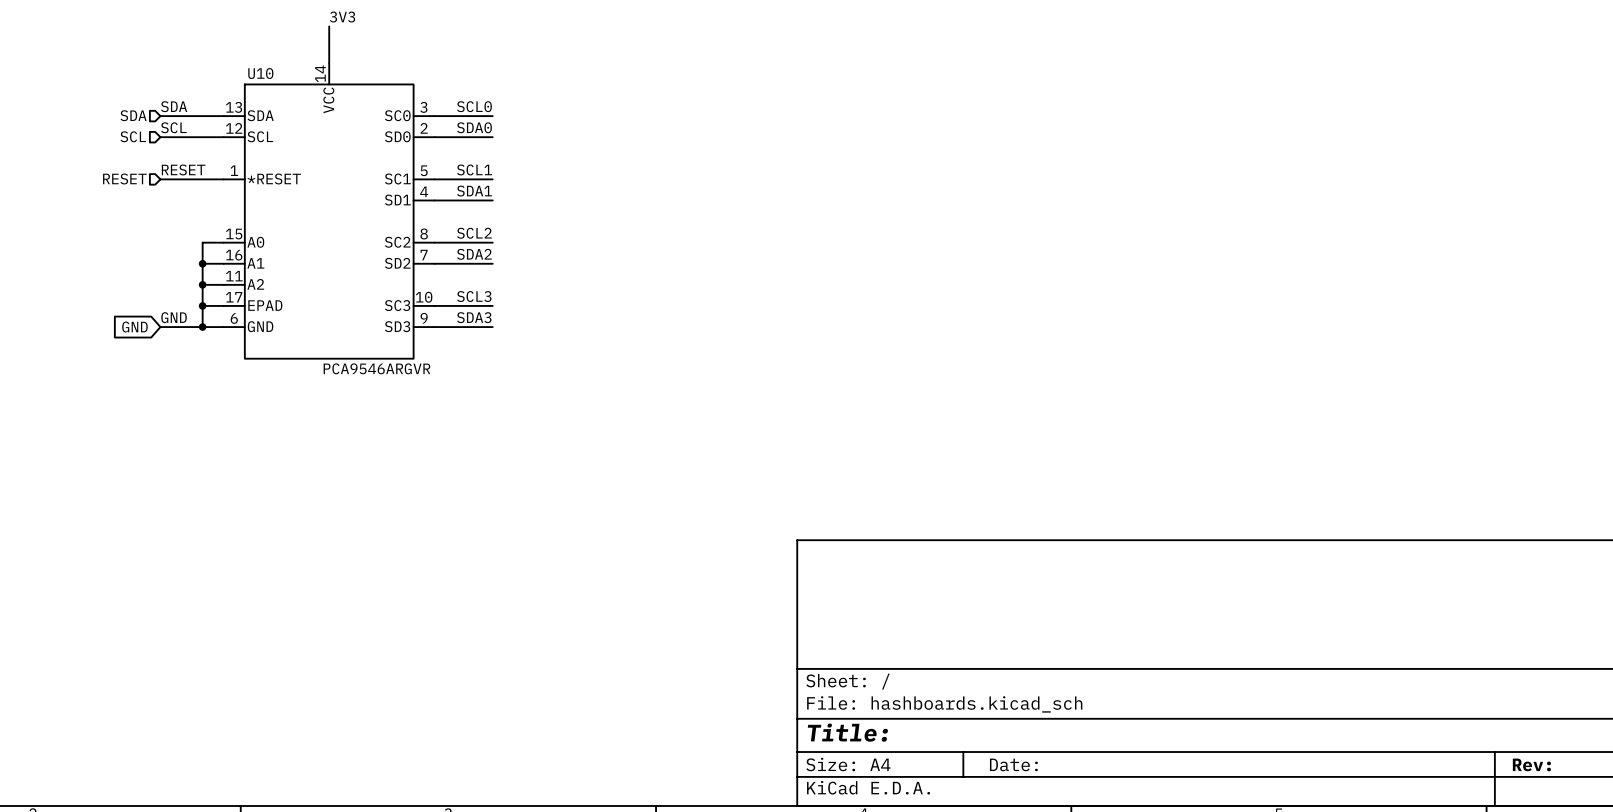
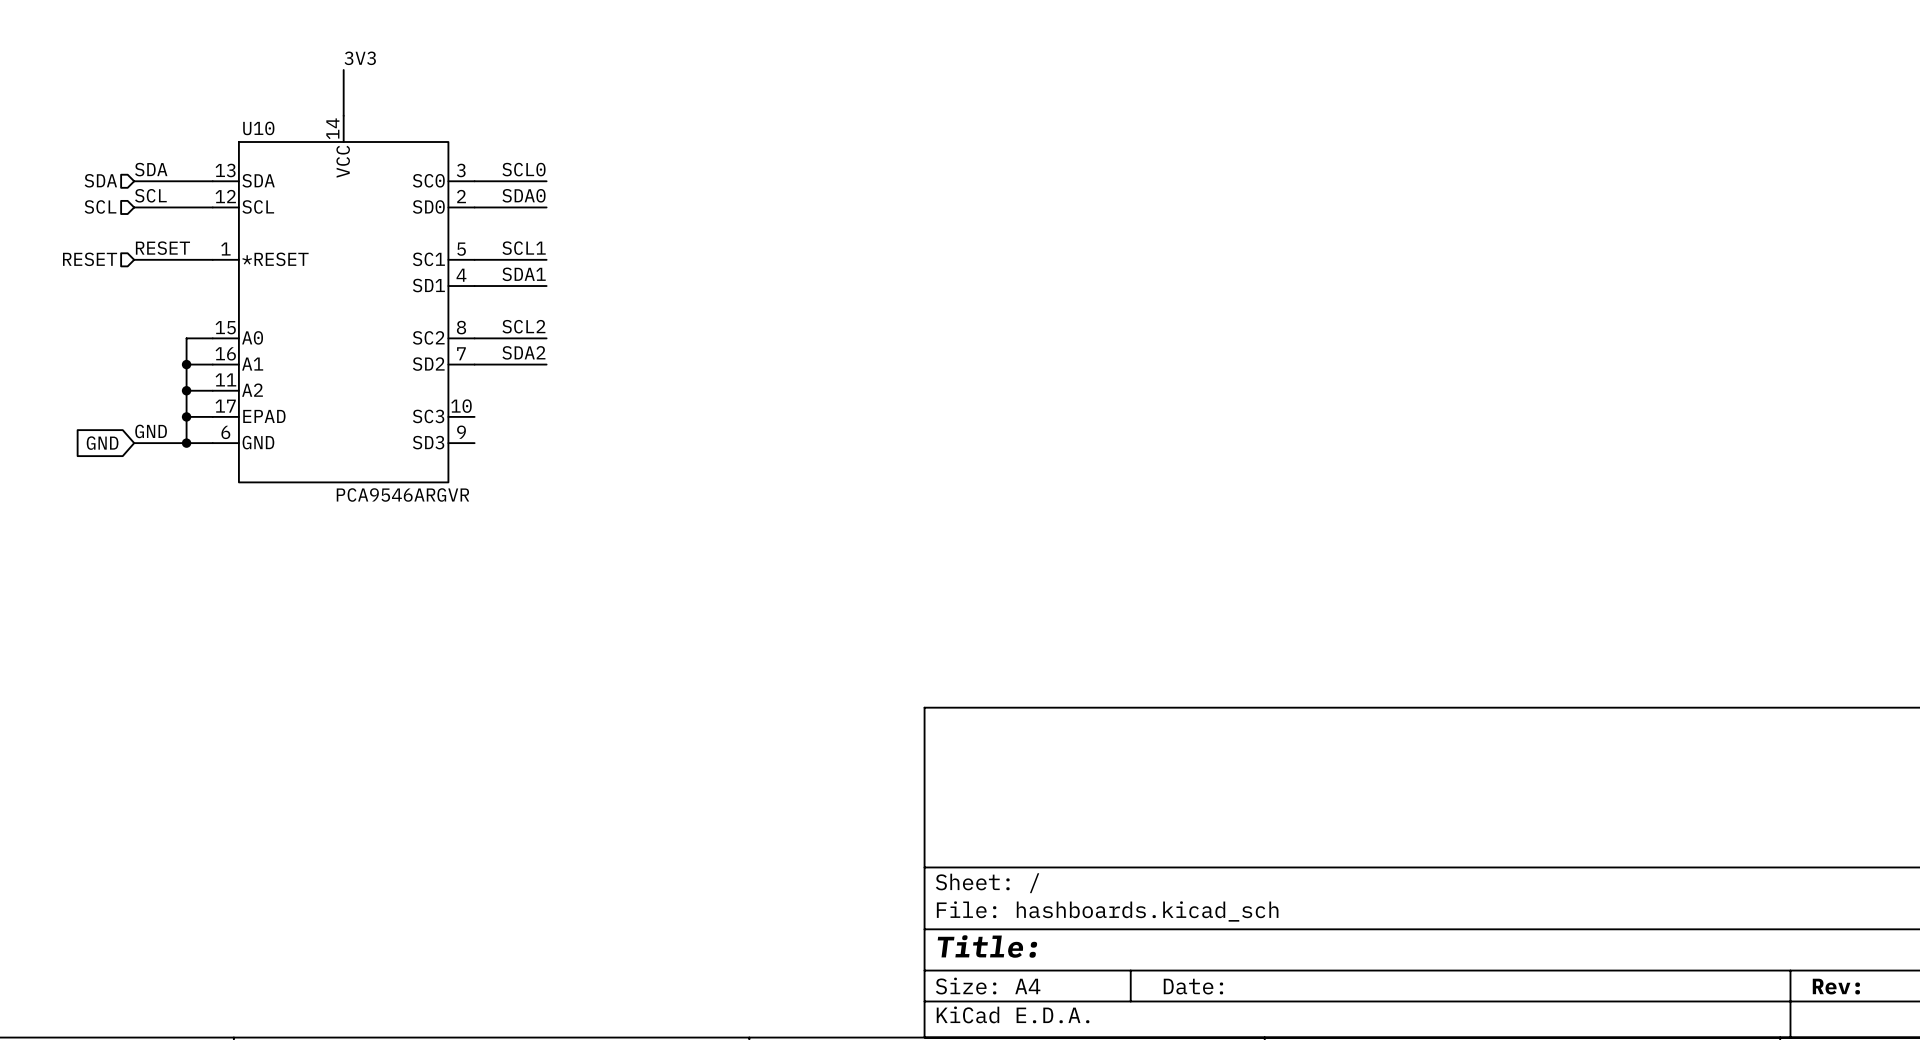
label: SCL3 (474, 296) -> none
wire: (434, 305) (492, 305) -> none
label: SDA3 (474, 317) -> none
wire: (434, 327) (492, 327) -> none

